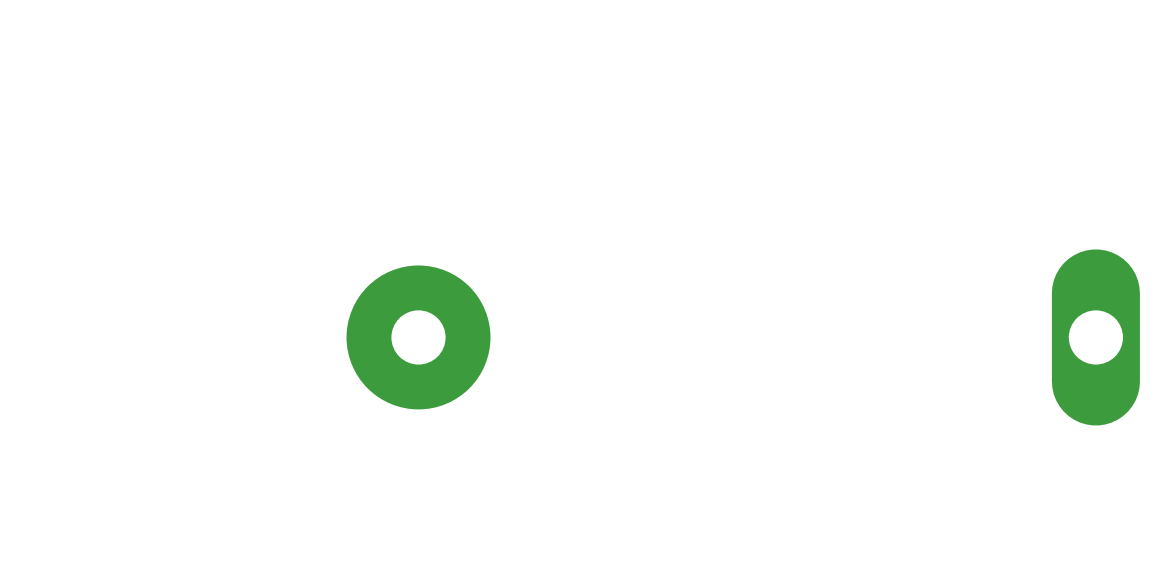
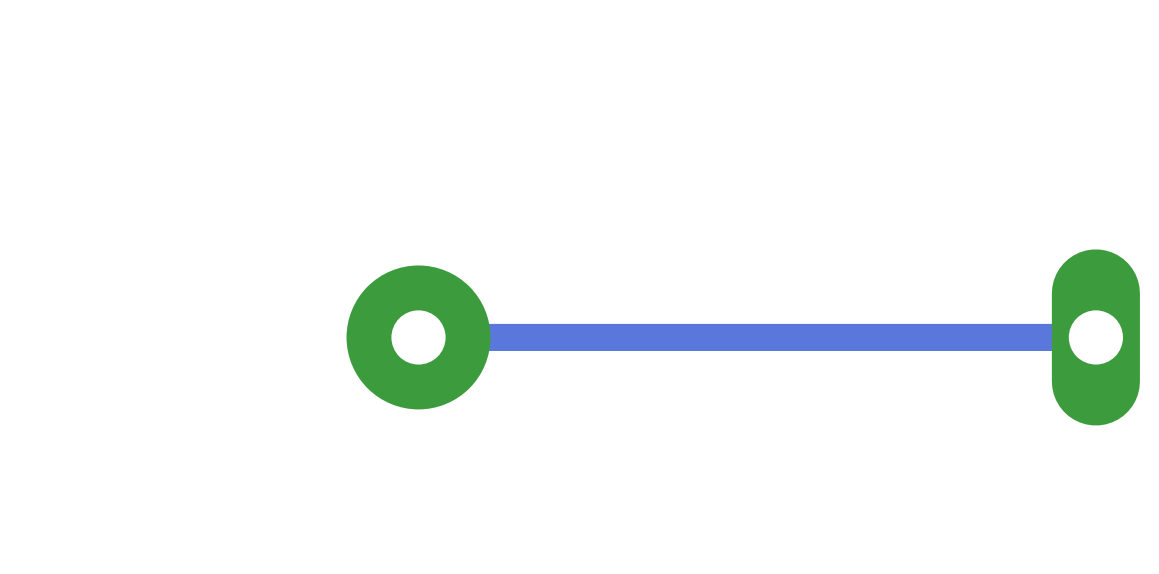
track: none -> (1095, 337) (418, 337)

